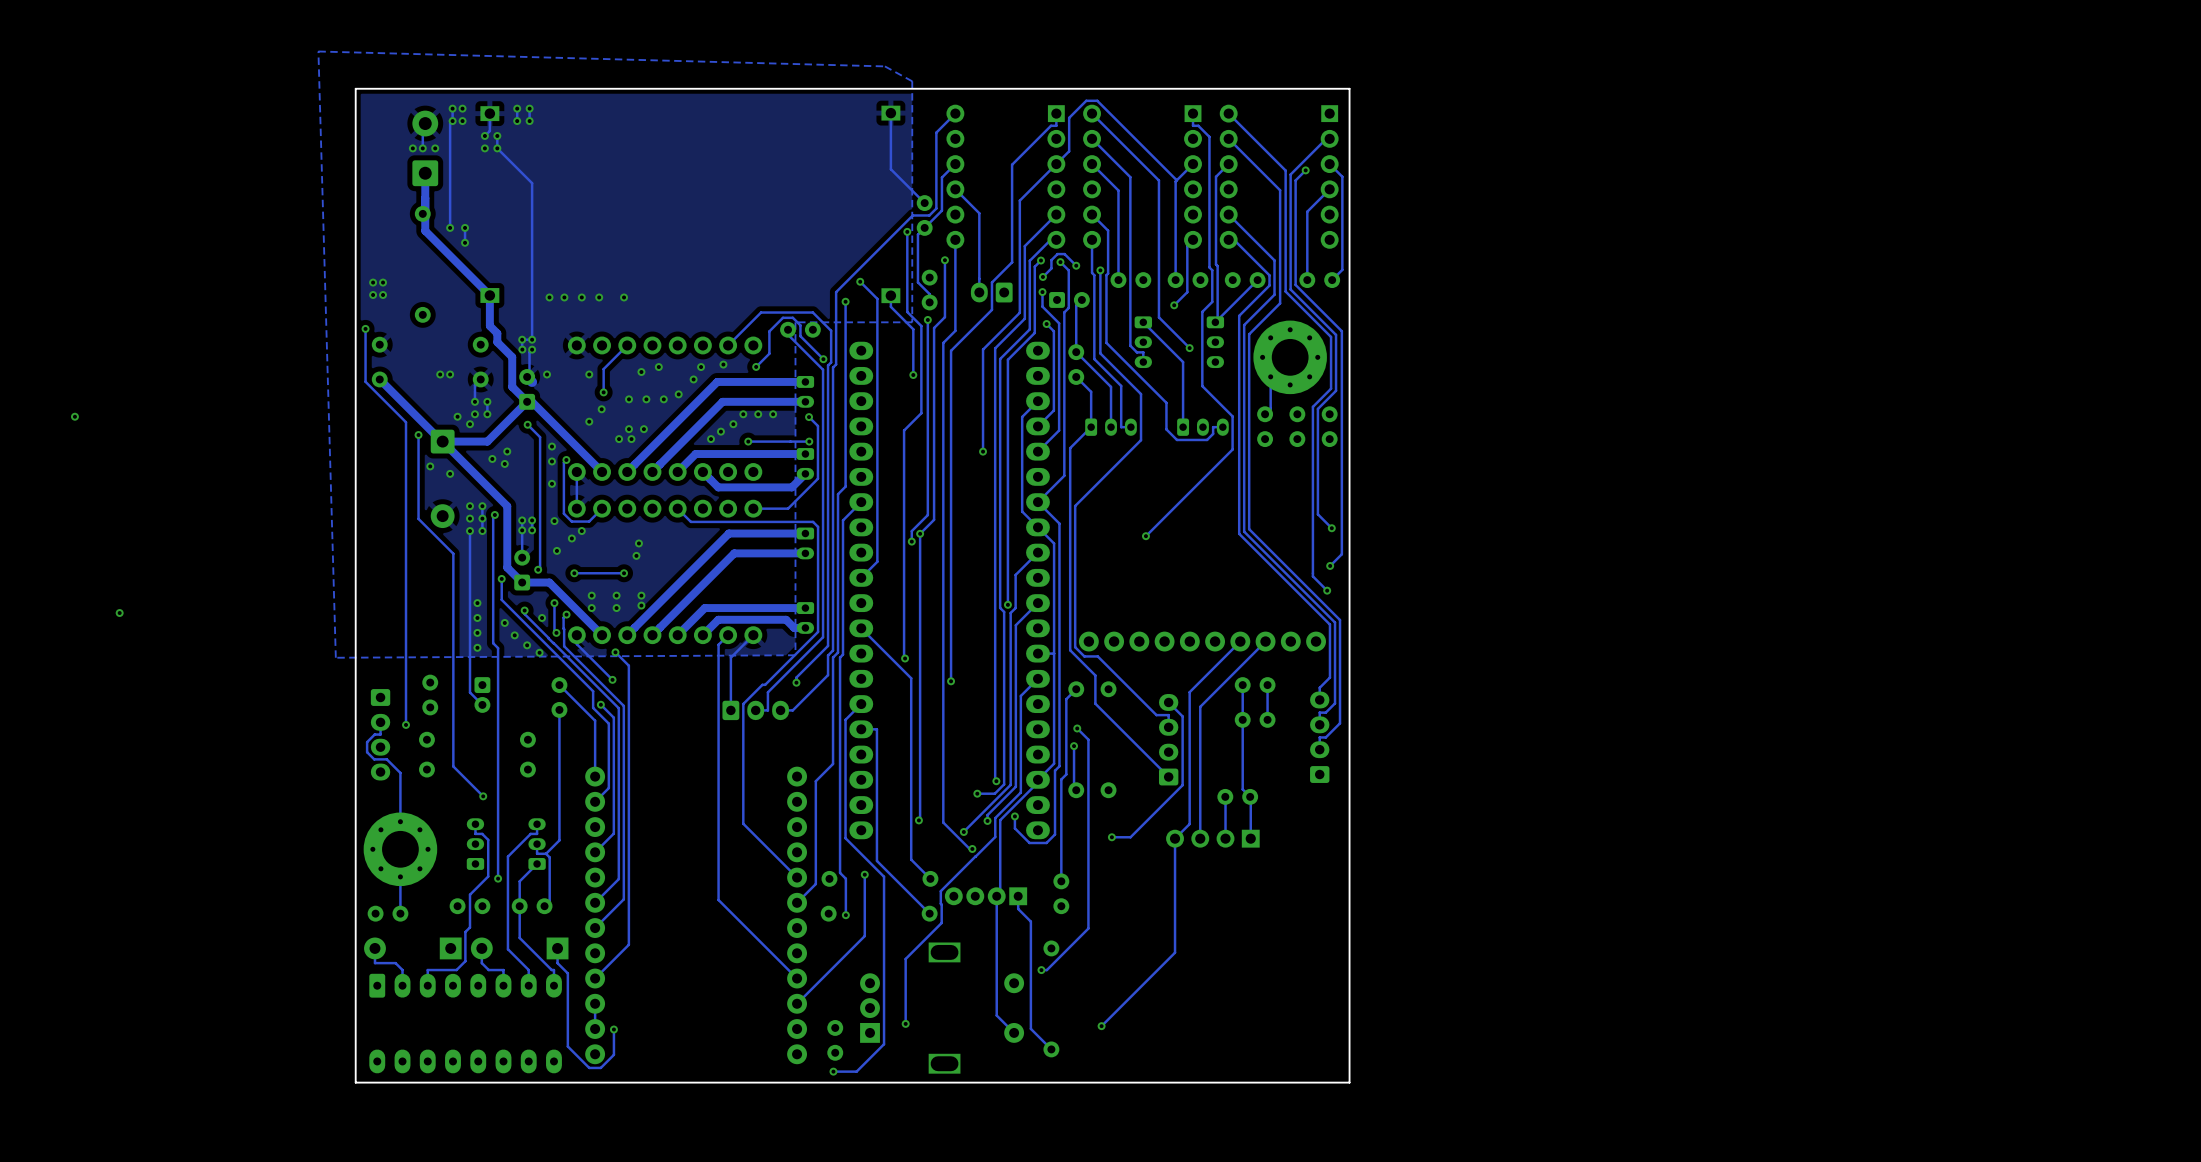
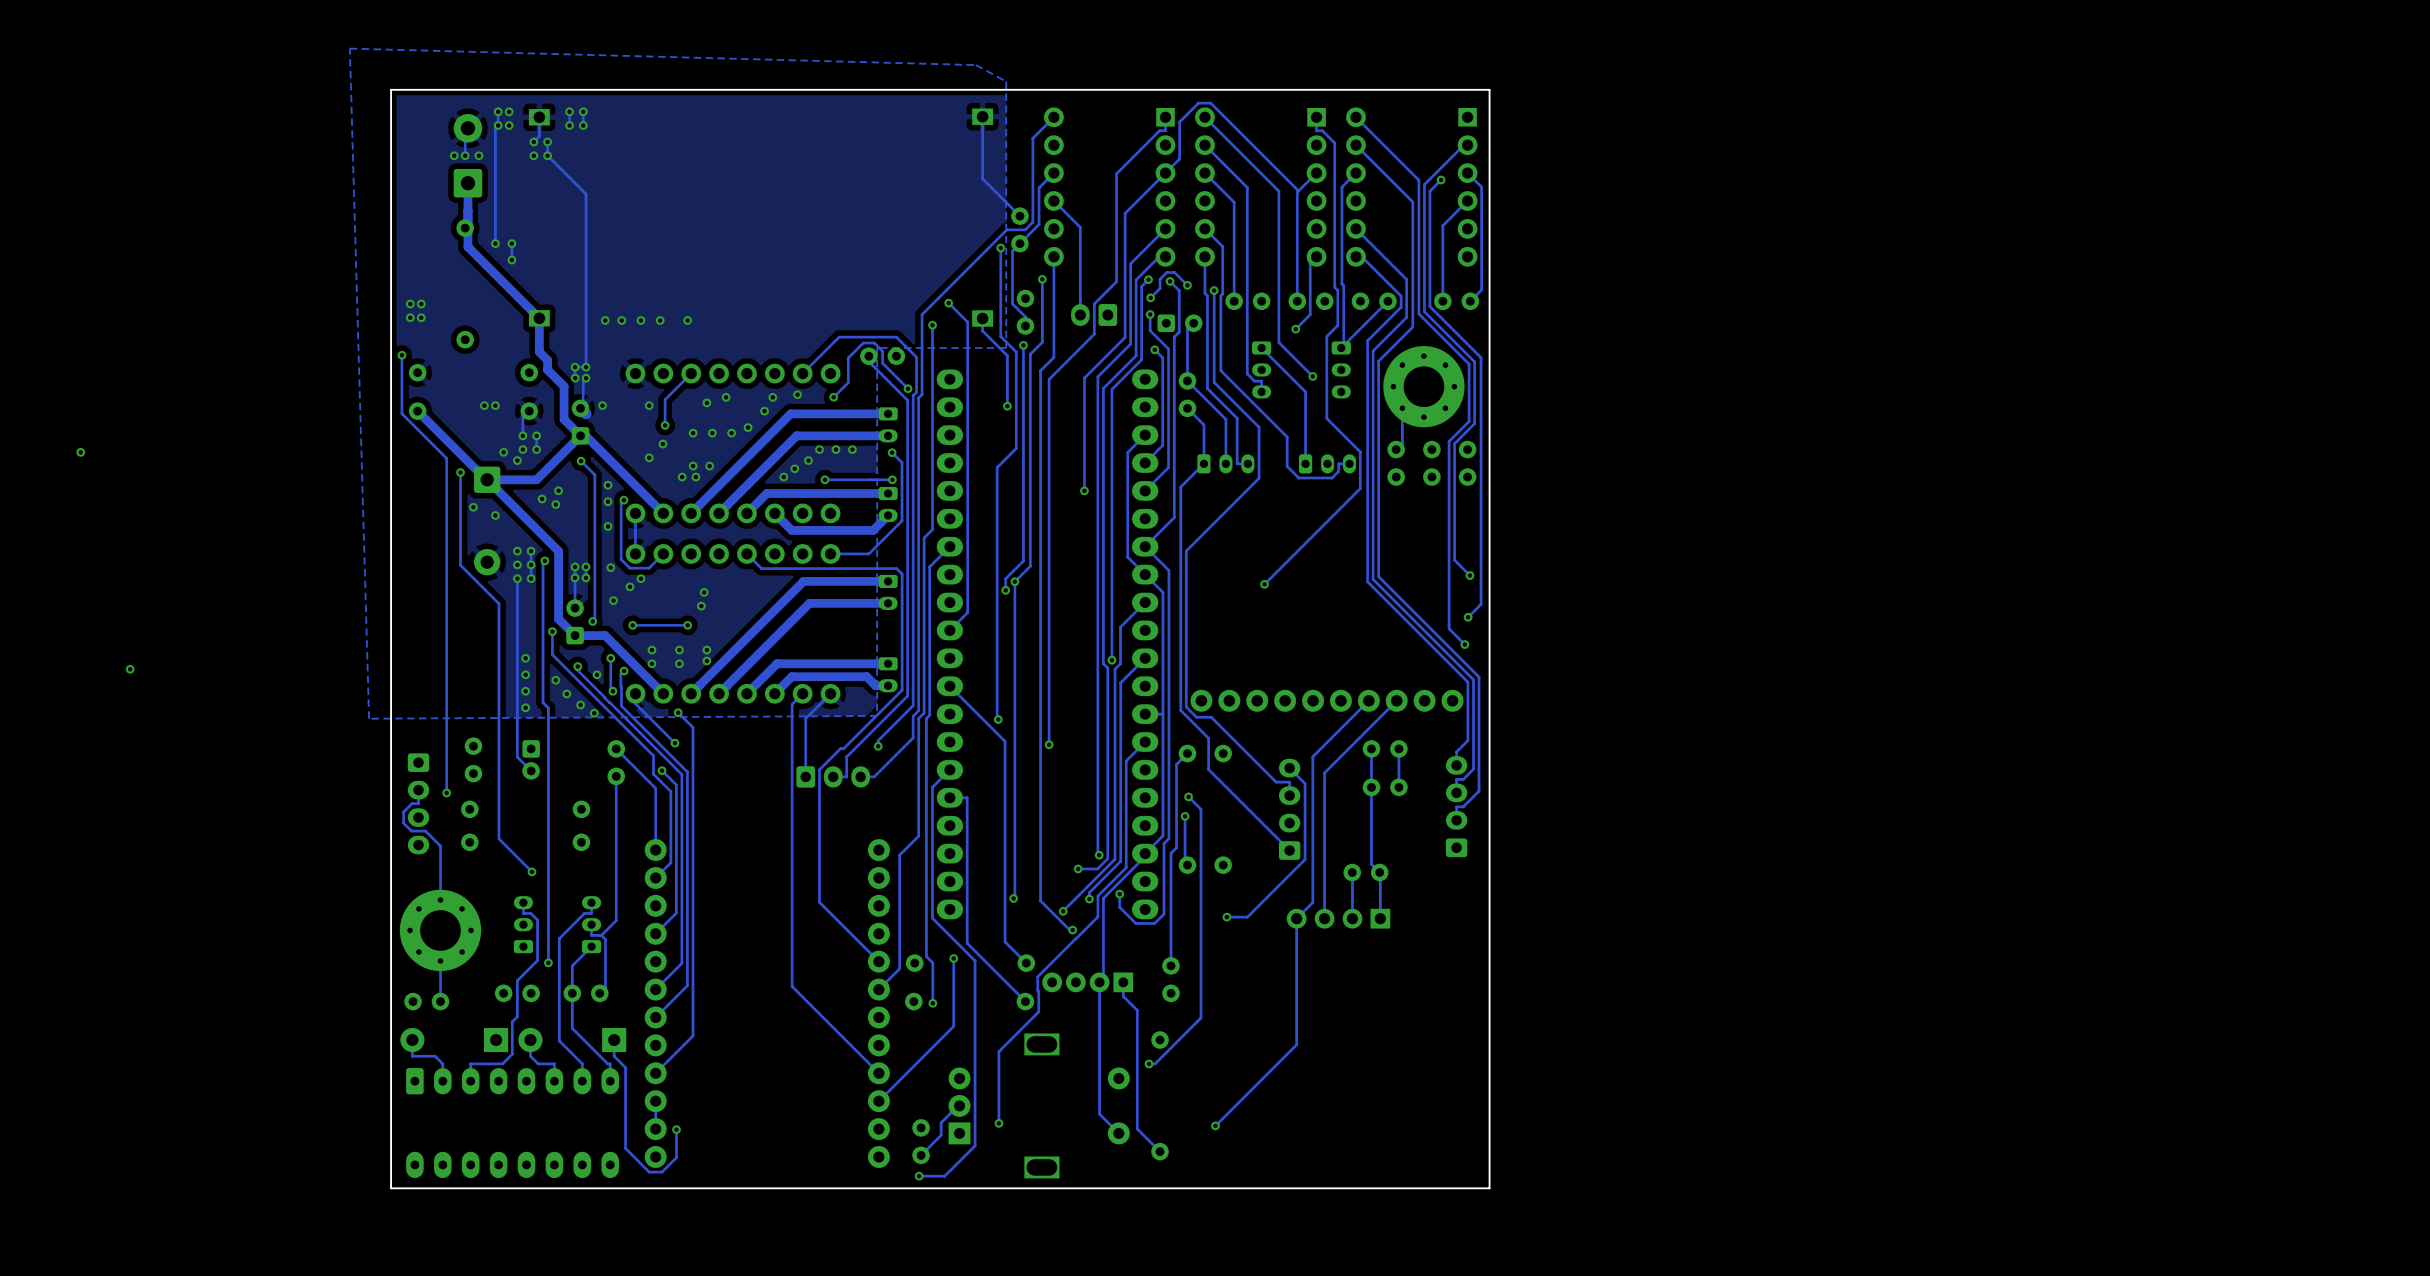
track: none -> (958, 1105) (941, 1122) (941, 1135) (921, 1155)

